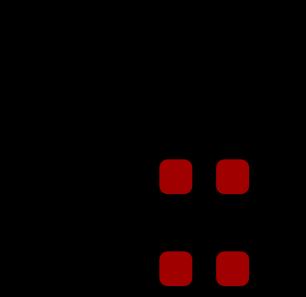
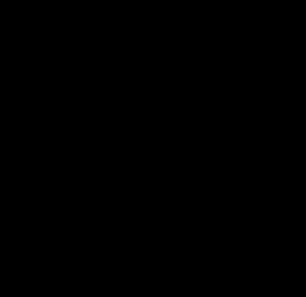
part: (204, 176) -> none
part: (204, 268) -> none

